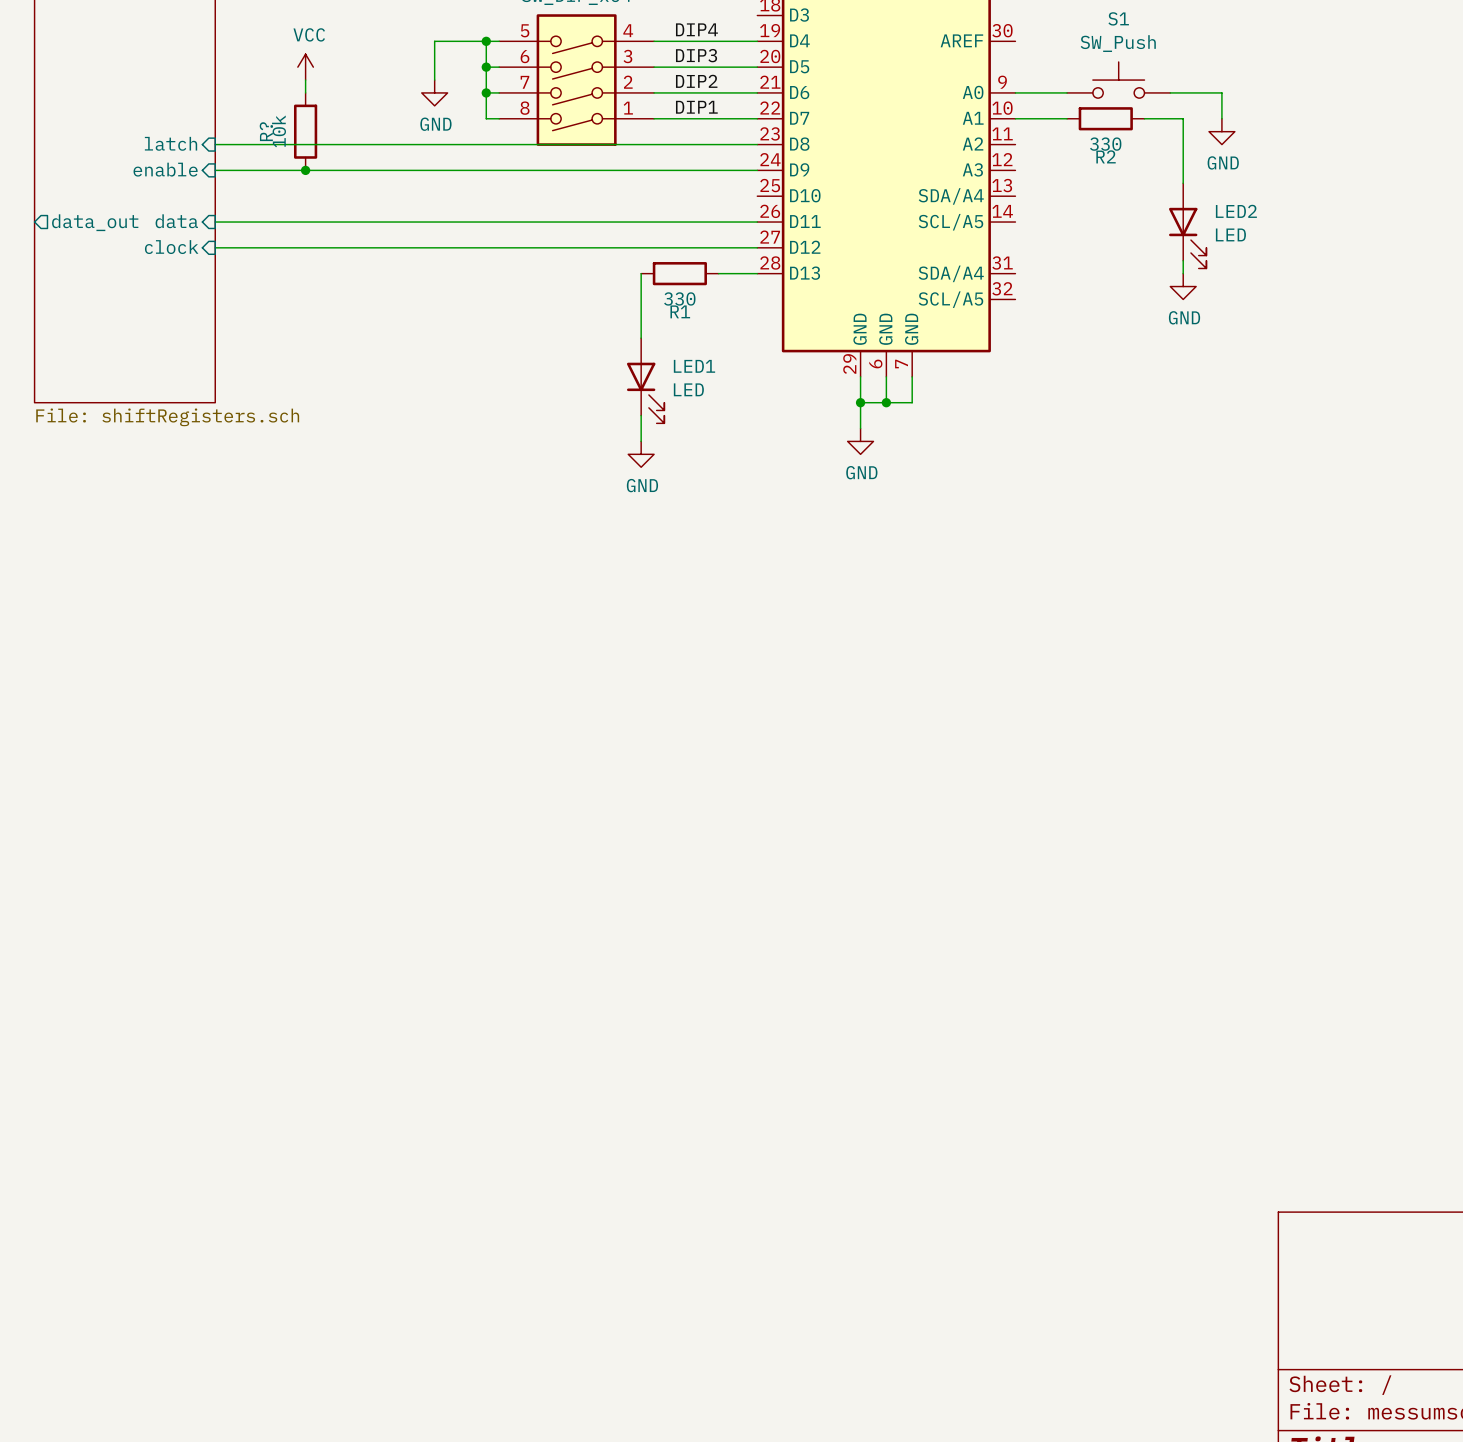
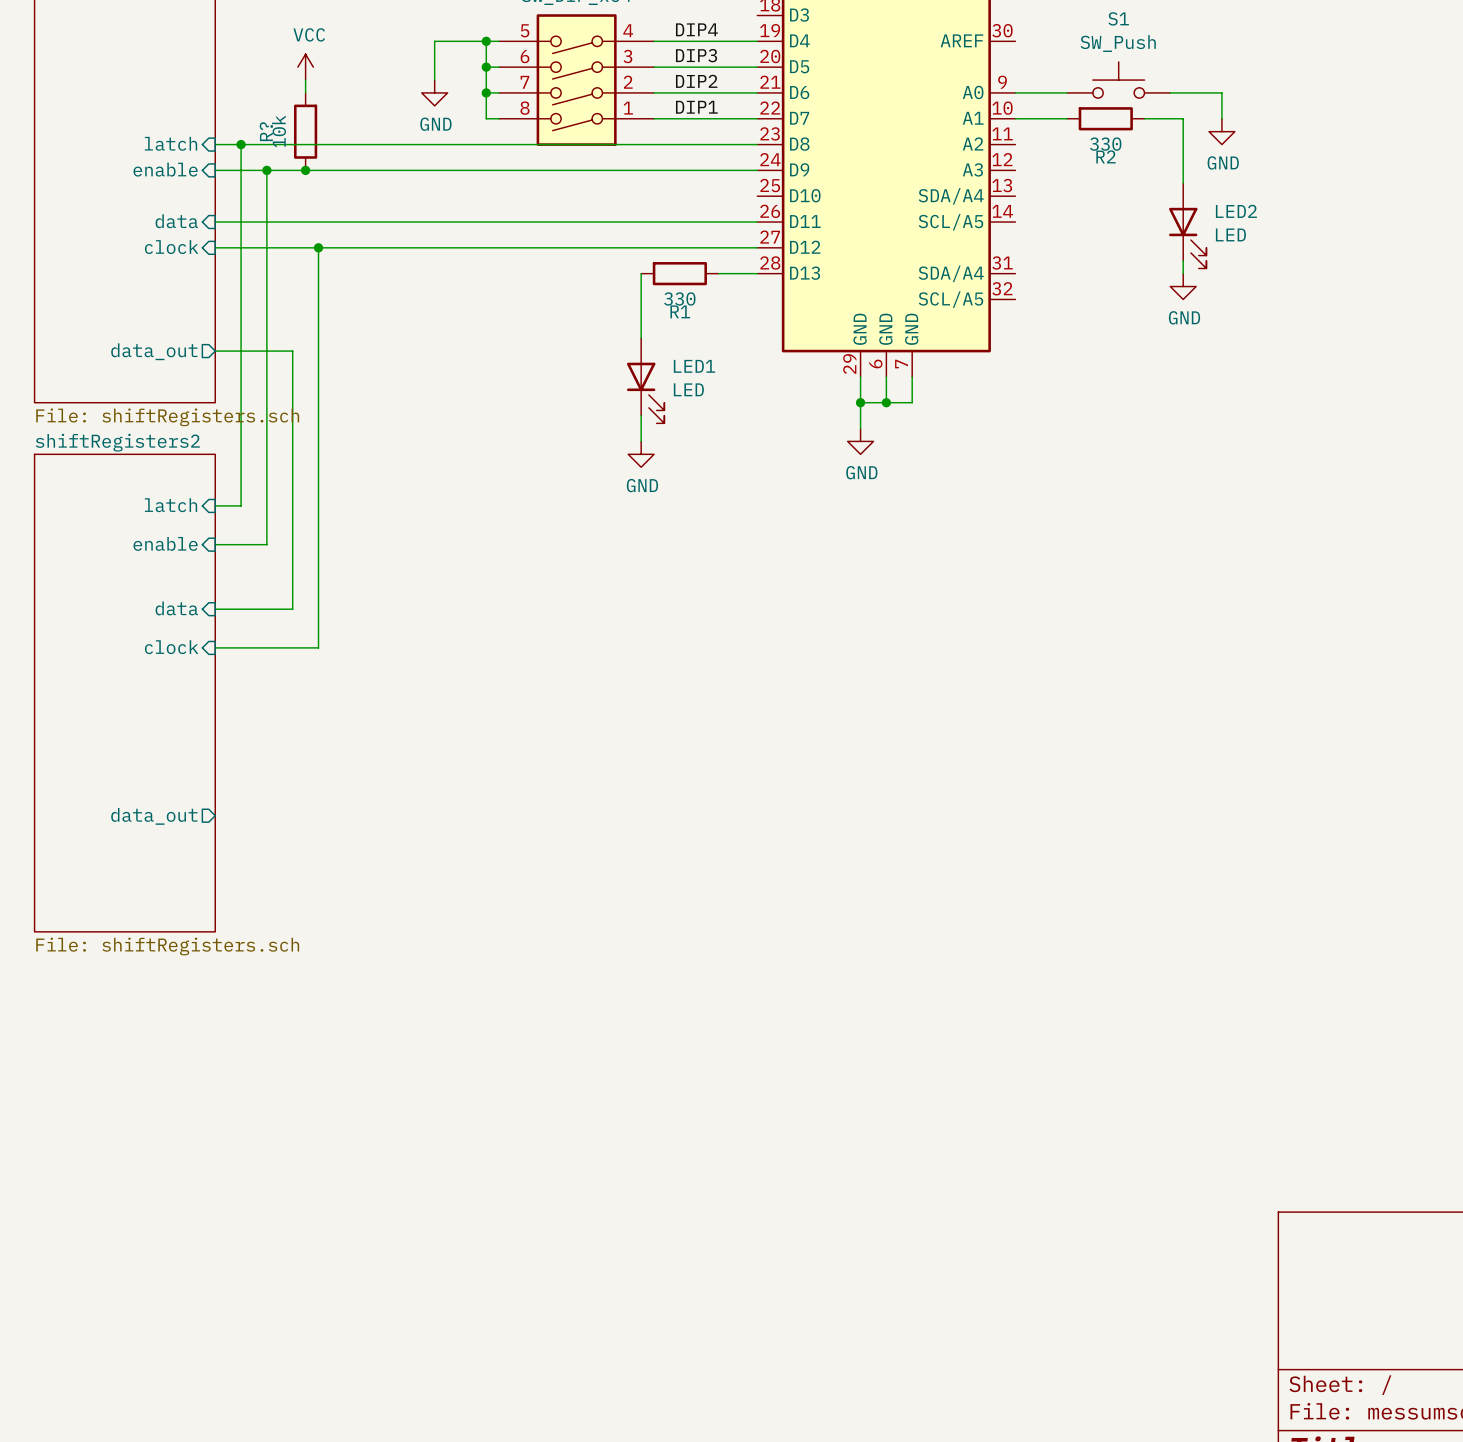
wire: none -> (241, 144) (241, 505) (215, 505)
junction: none -> (241, 144)
wire: none -> (266, 170) (266, 544) (215, 544)
junction: none -> (266, 170)
sheet pin rotation: 0° (95, 222) -> 180° (154, 351)
sheet pin position: data_out (95, 222) -> data_out (154, 351)
wire: none -> (318, 247) (318, 647) (215, 647)
junction: none -> (318, 247)
wire: none -> (215, 351) (292, 351) (292, 609) (215, 609)
sheet pin: none -> latch (171, 505)
sheet pin: none -> enable (165, 543)
sheet pin: none -> data (176, 608)
sheet pin: none -> clock (171, 647)
sheet shiftRegisters2: none -> File: shiftRegisters.sch (124, 693)
sheet pin: none -> data_out (154, 816)

